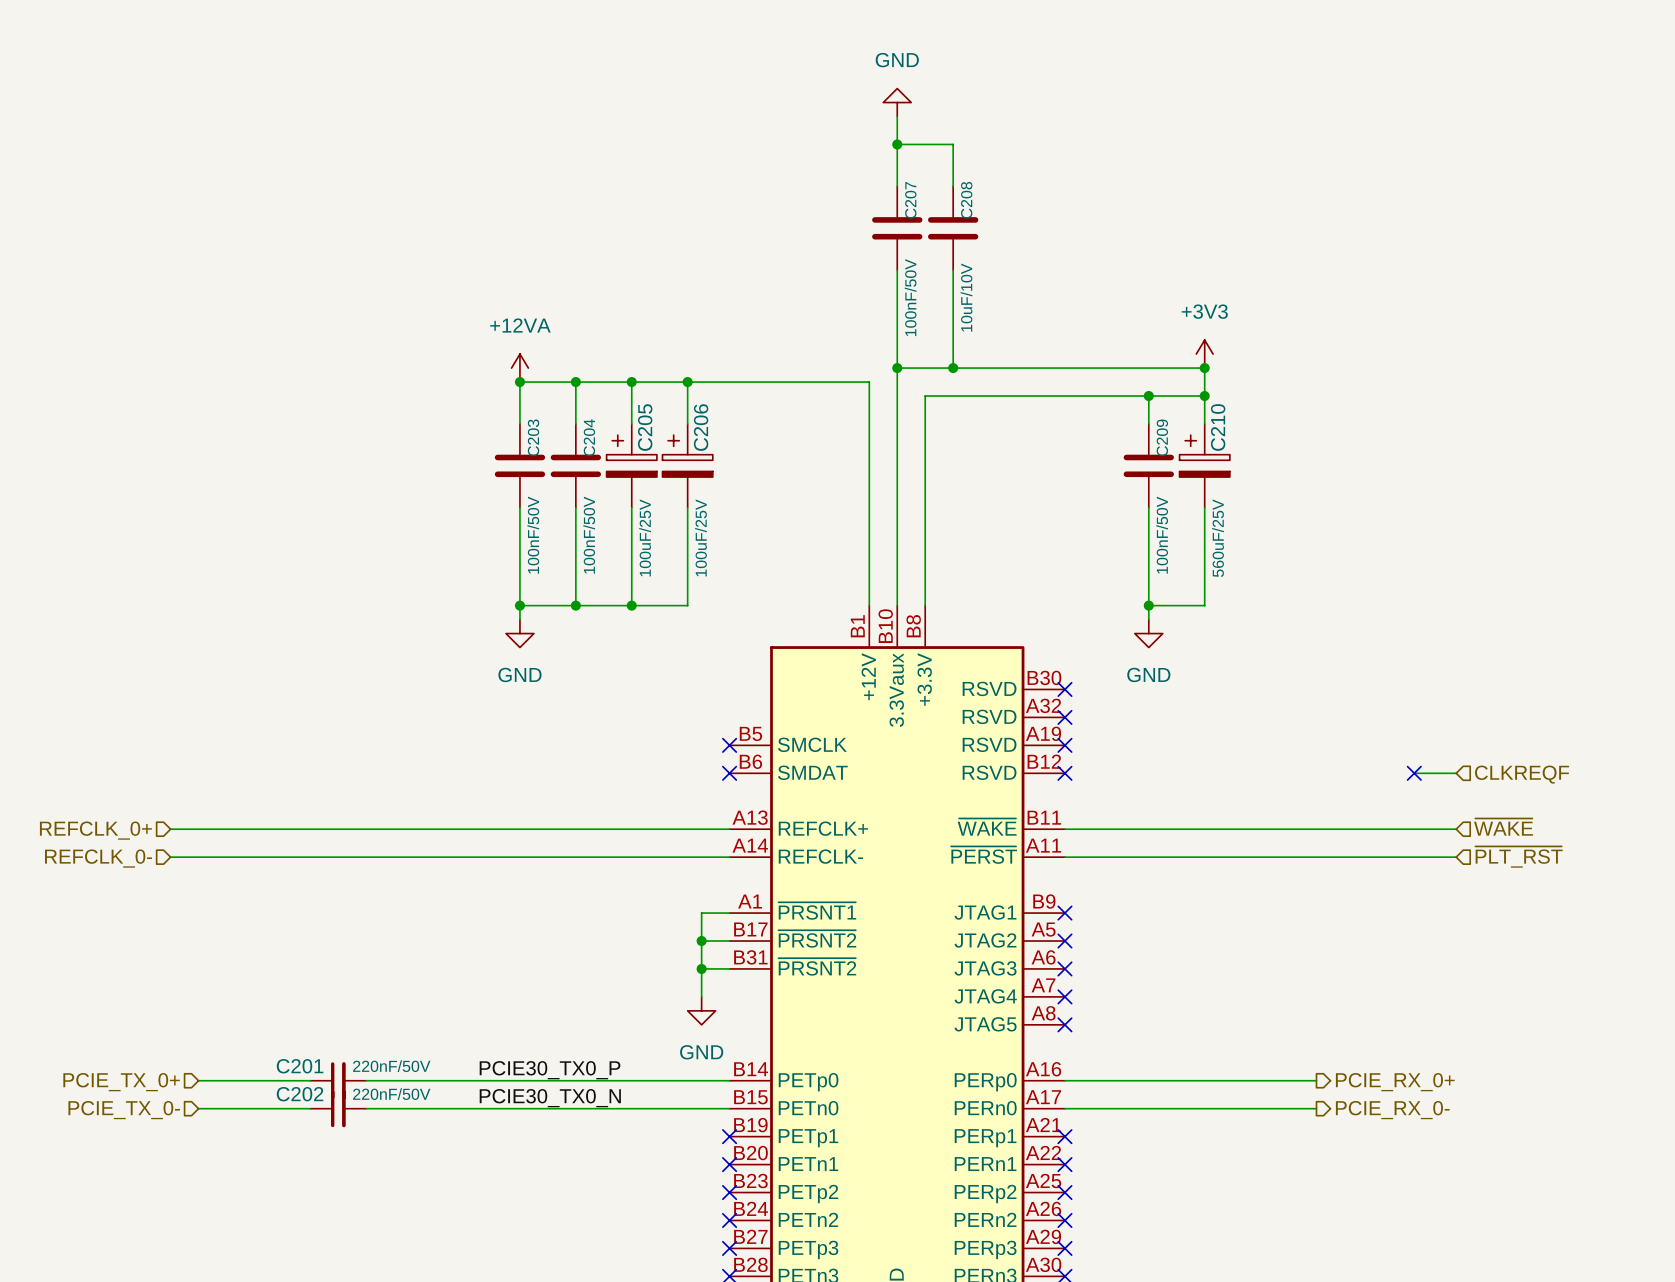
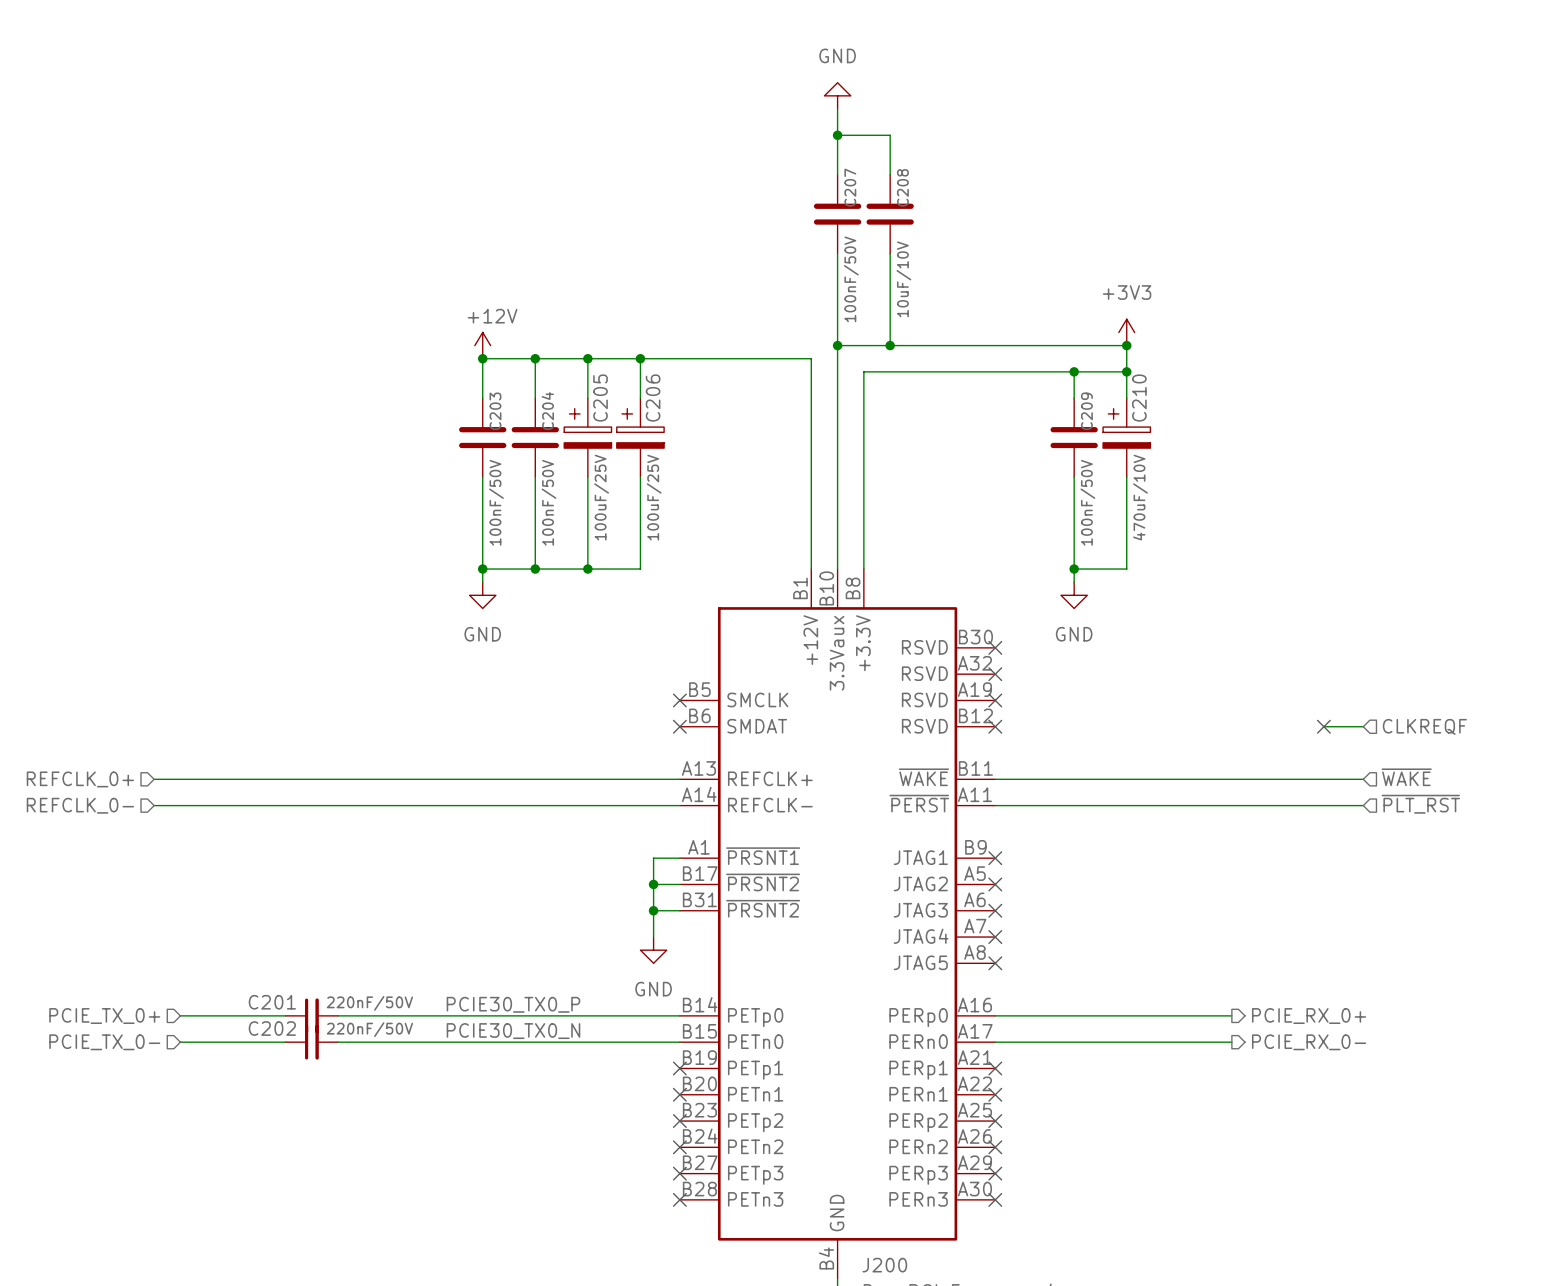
power symbol: +12VA (519, 368) -> +12V (482, 345)
C210 value: 560uF/25V (1218, 538) -> 470uF/10V (1140, 497)

